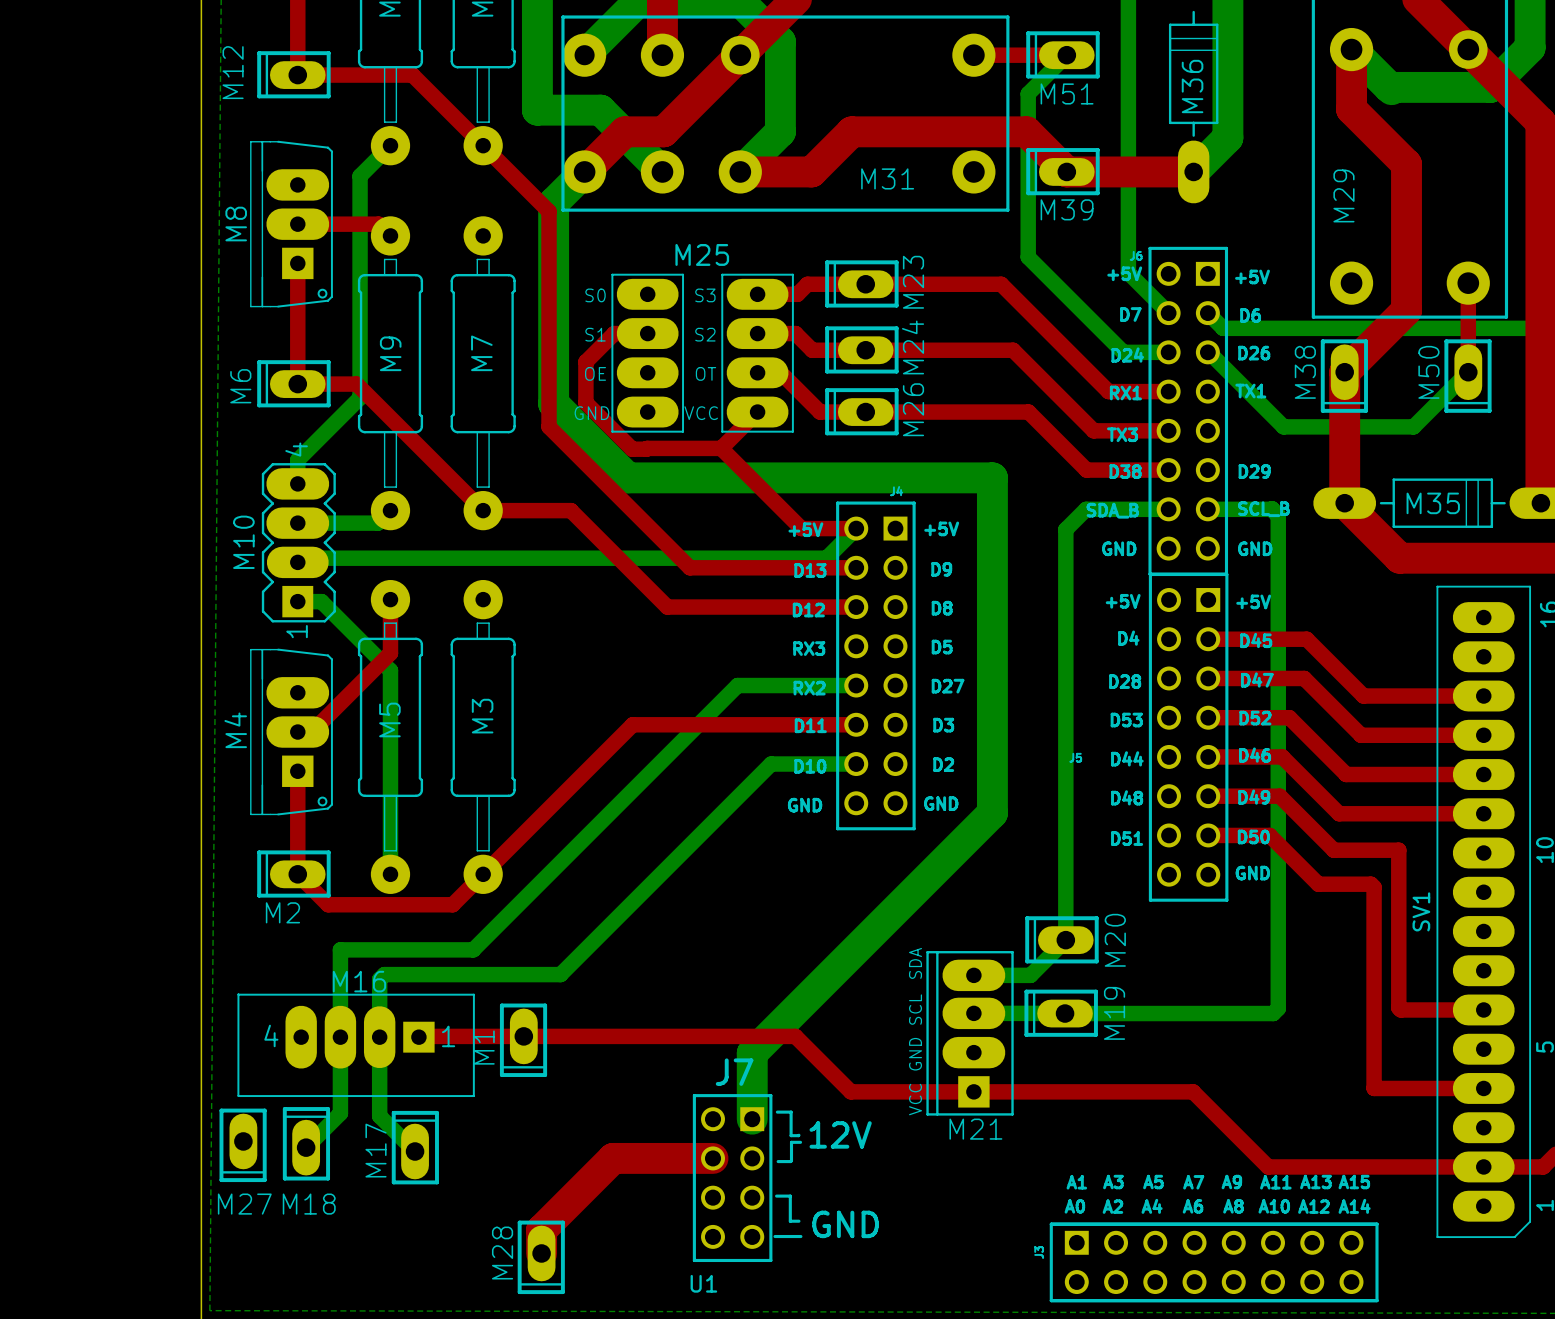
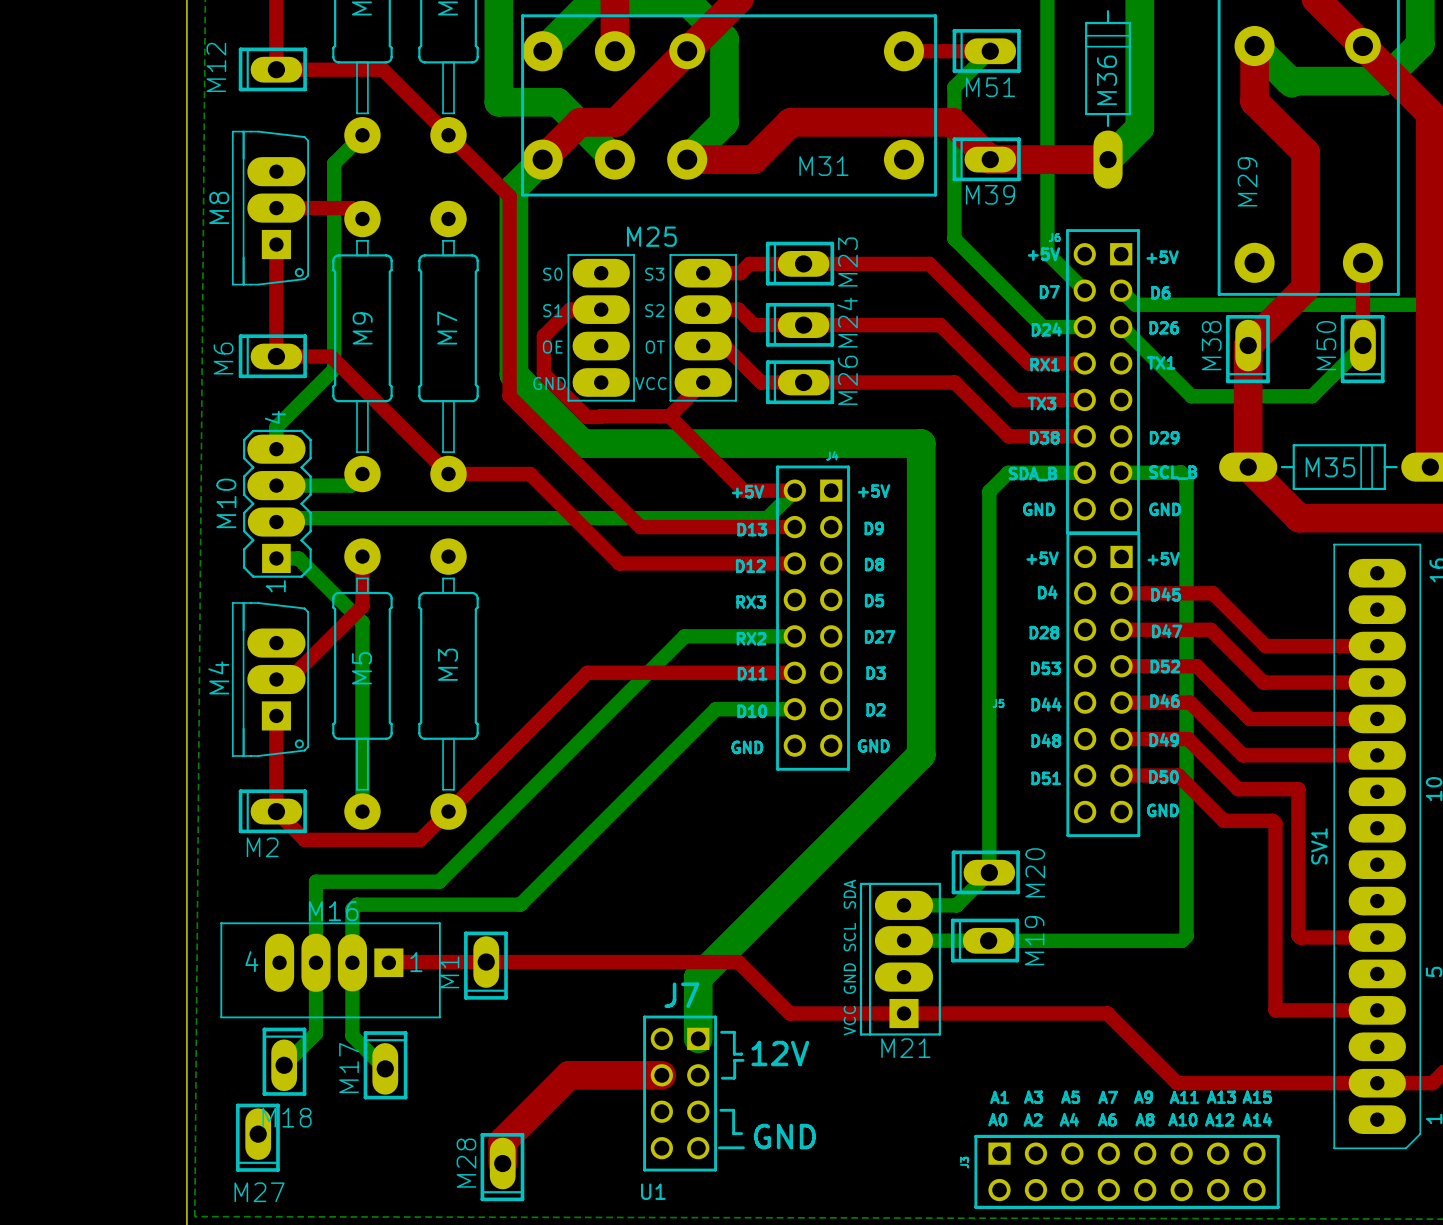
M27 position: (243, 1145) -> (257, 1137)

